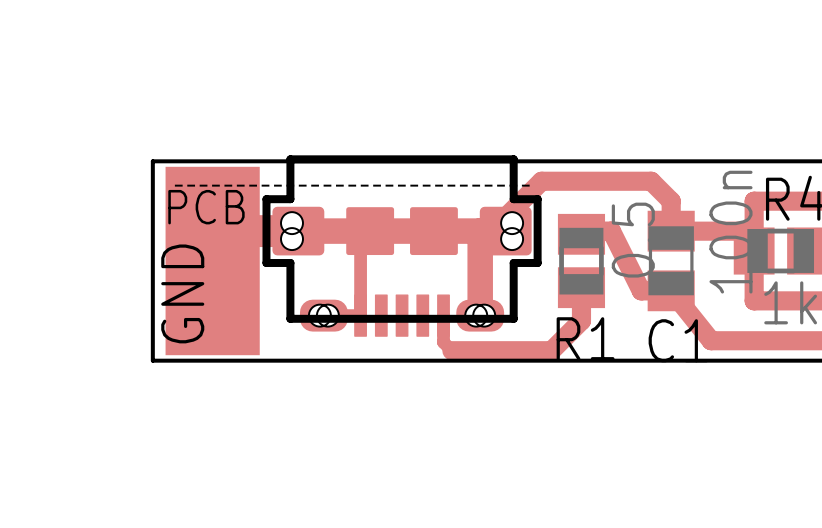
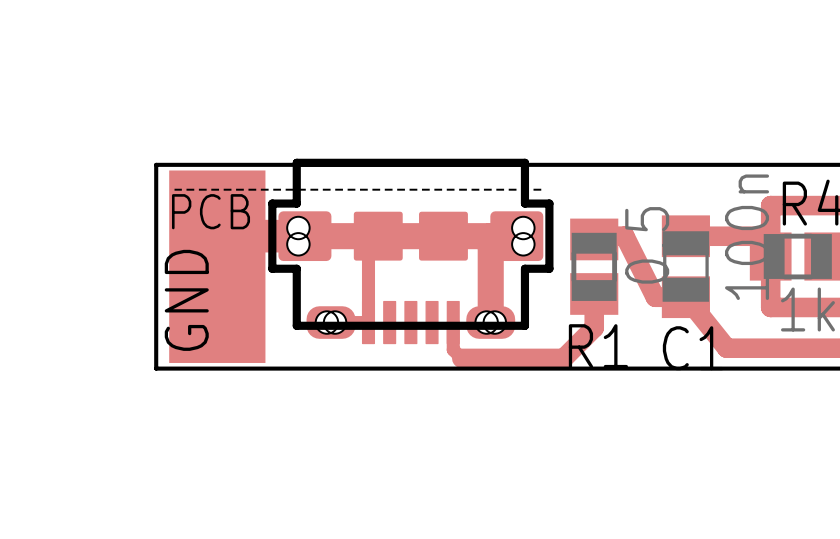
track: (505, 231) (505, 217) (541, 181) (651, 181) (671, 201) (671, 231) -> none

